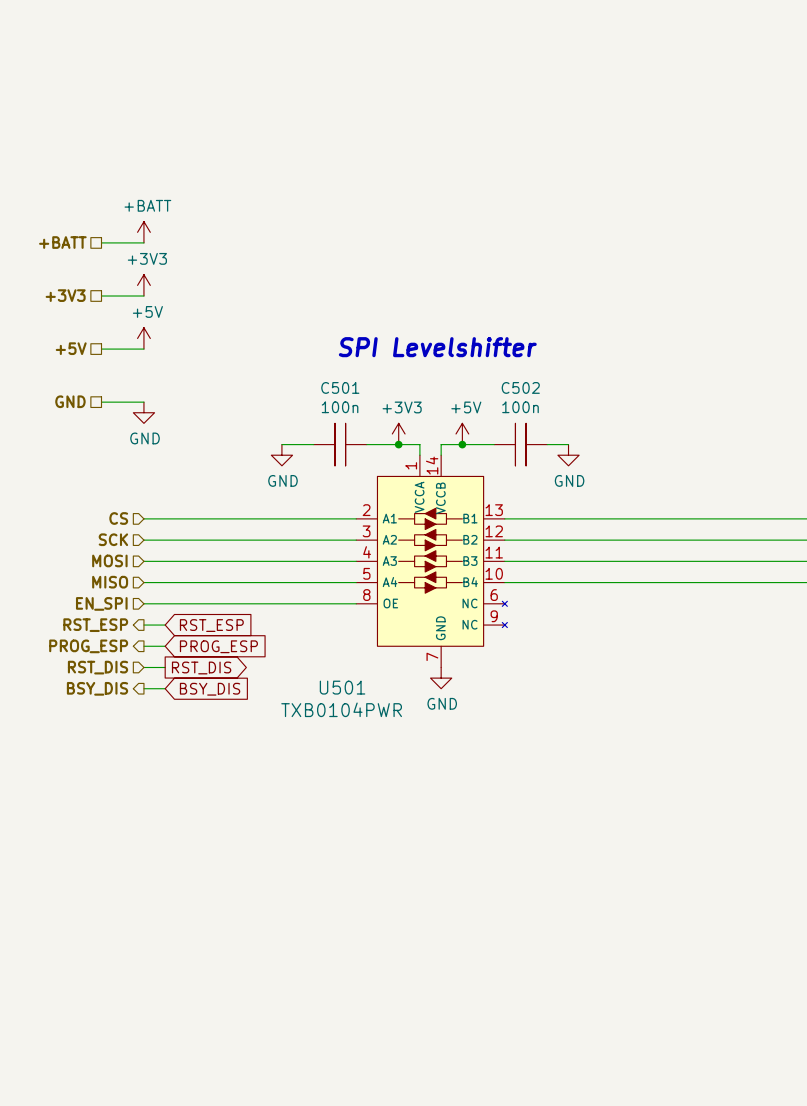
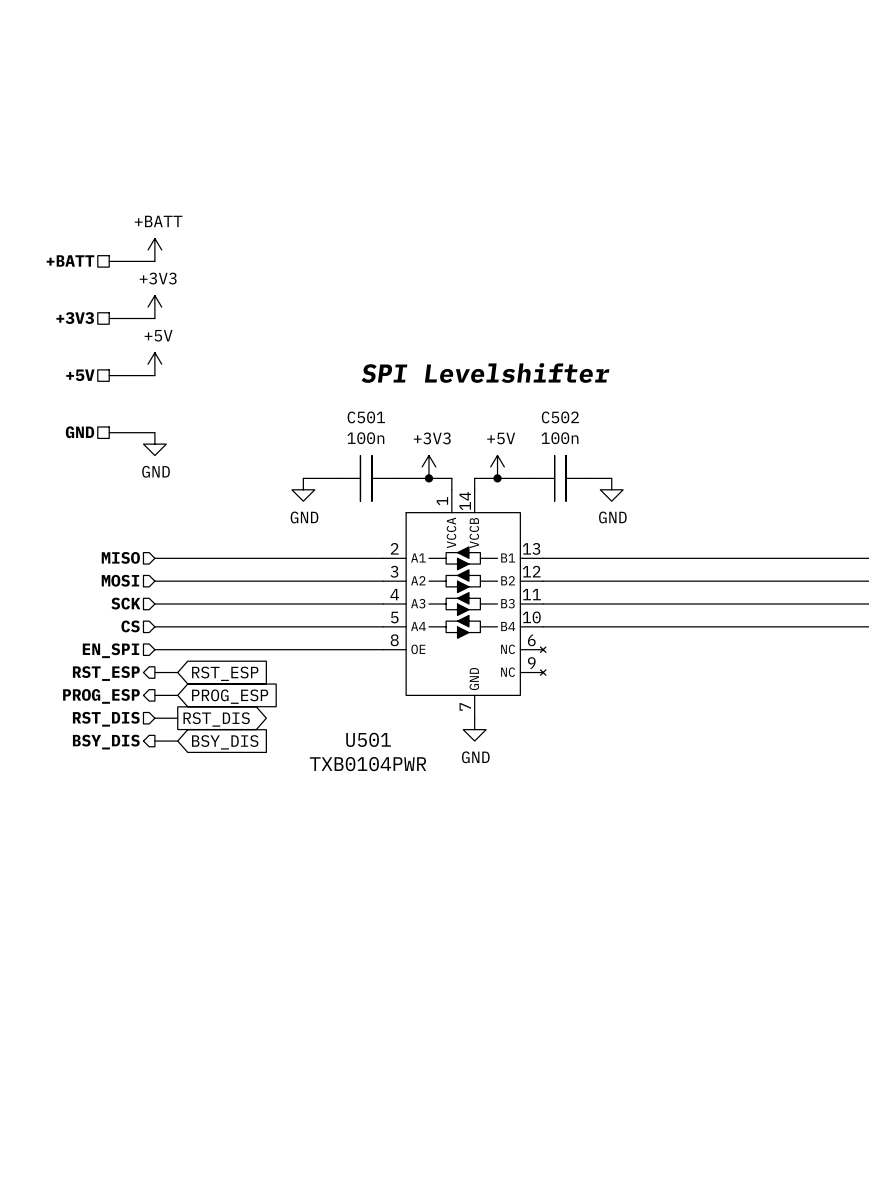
hierarchical label: CS (118, 518) -> MISO (120, 557)
hierarchical label: SCK (113, 539) -> MOSI (120, 580)
hierarchical label: MOSI (109, 560) -> SCK (125, 603)
hierarchical label: MISO (110, 582) -> CS (130, 626)

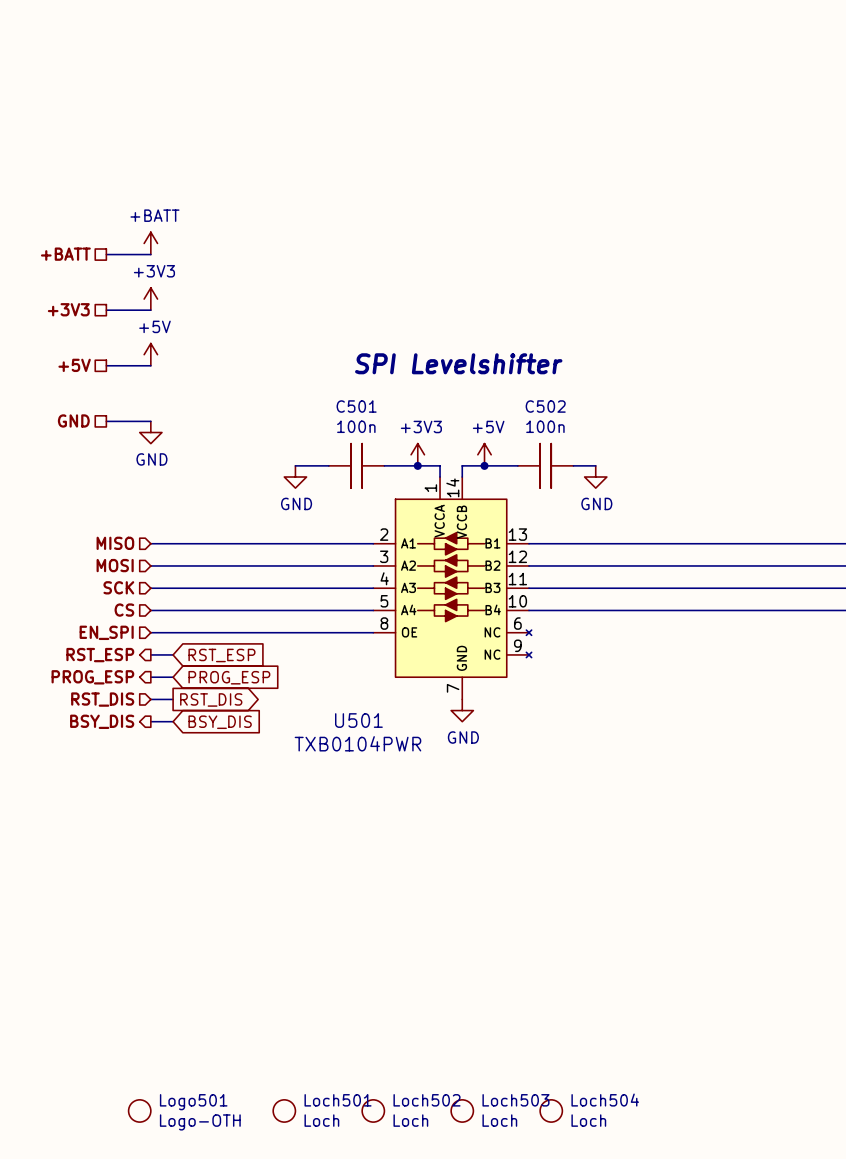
Logo501: none -> Logo-OTH (139, 1110)
Loch501: none -> Loch (284, 1110)
Loch502: none -> Loch (373, 1110)
Loch503: none -> Loch (462, 1110)
Loch504: none -> Loch (551, 1110)

